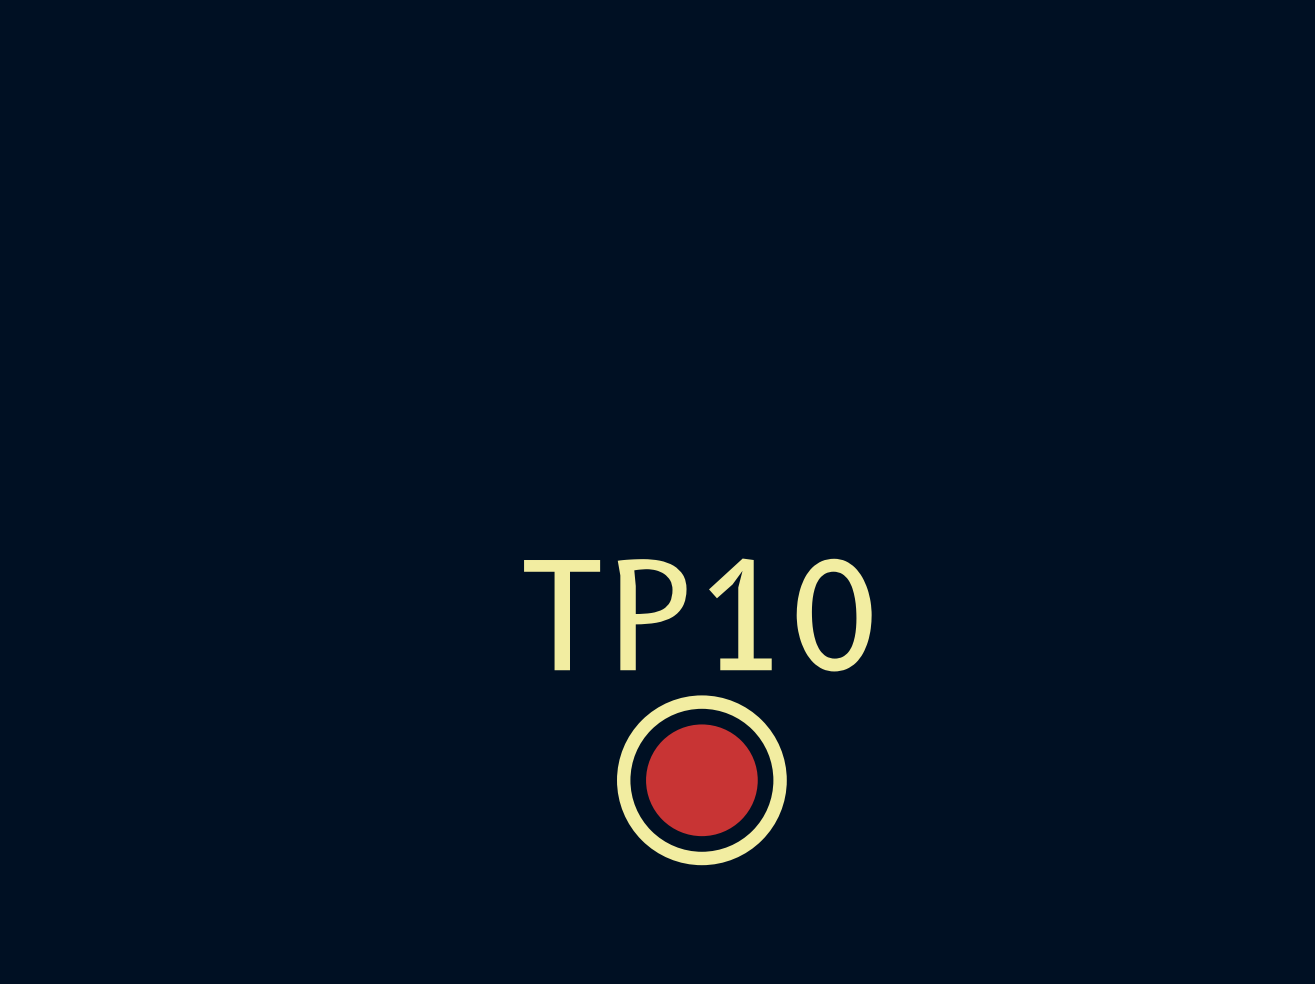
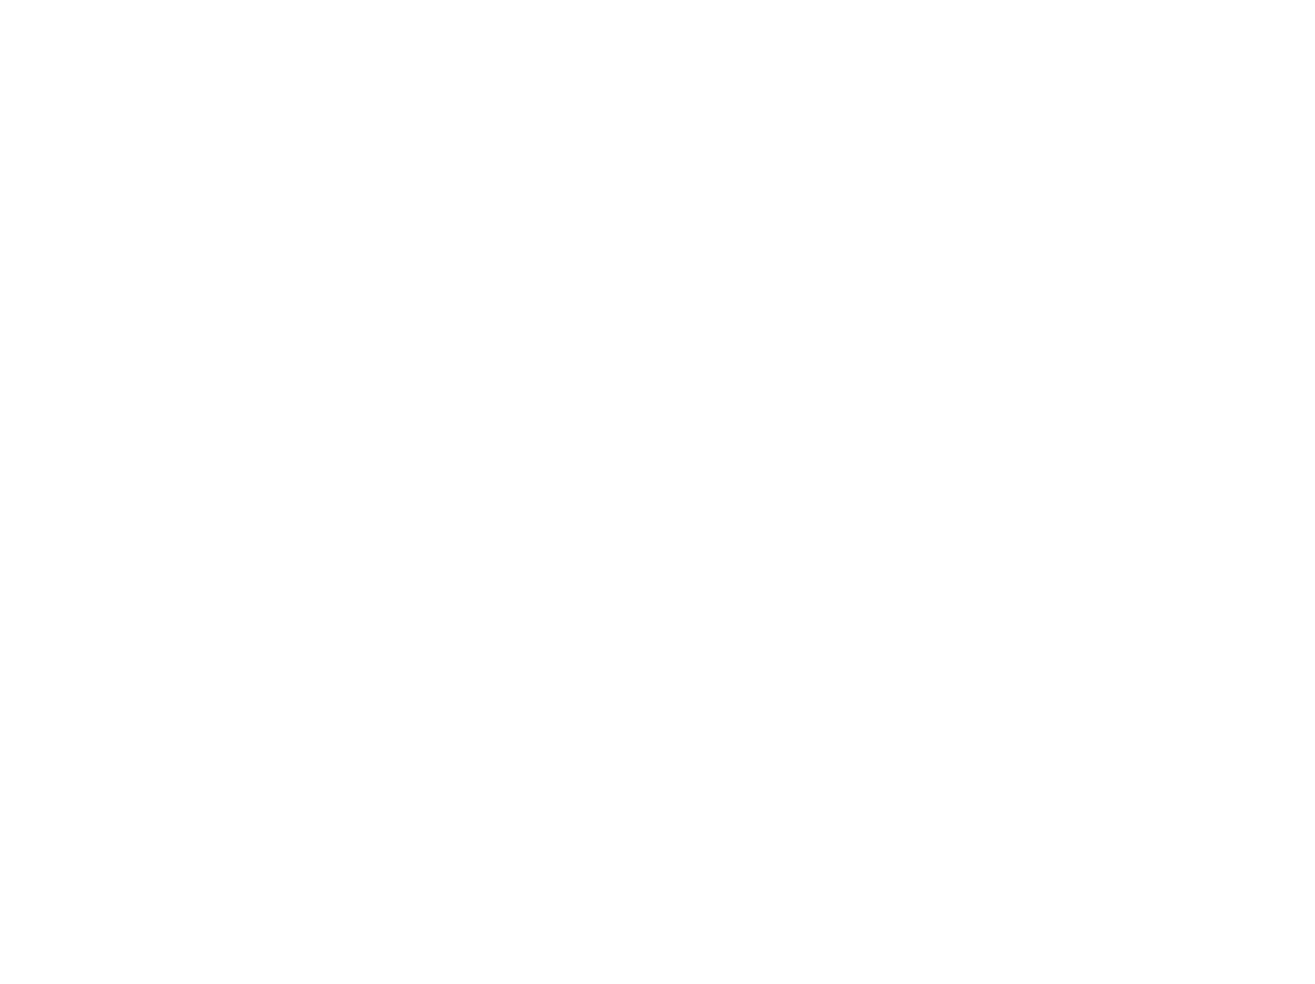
TP10: (701, 780) -> none

